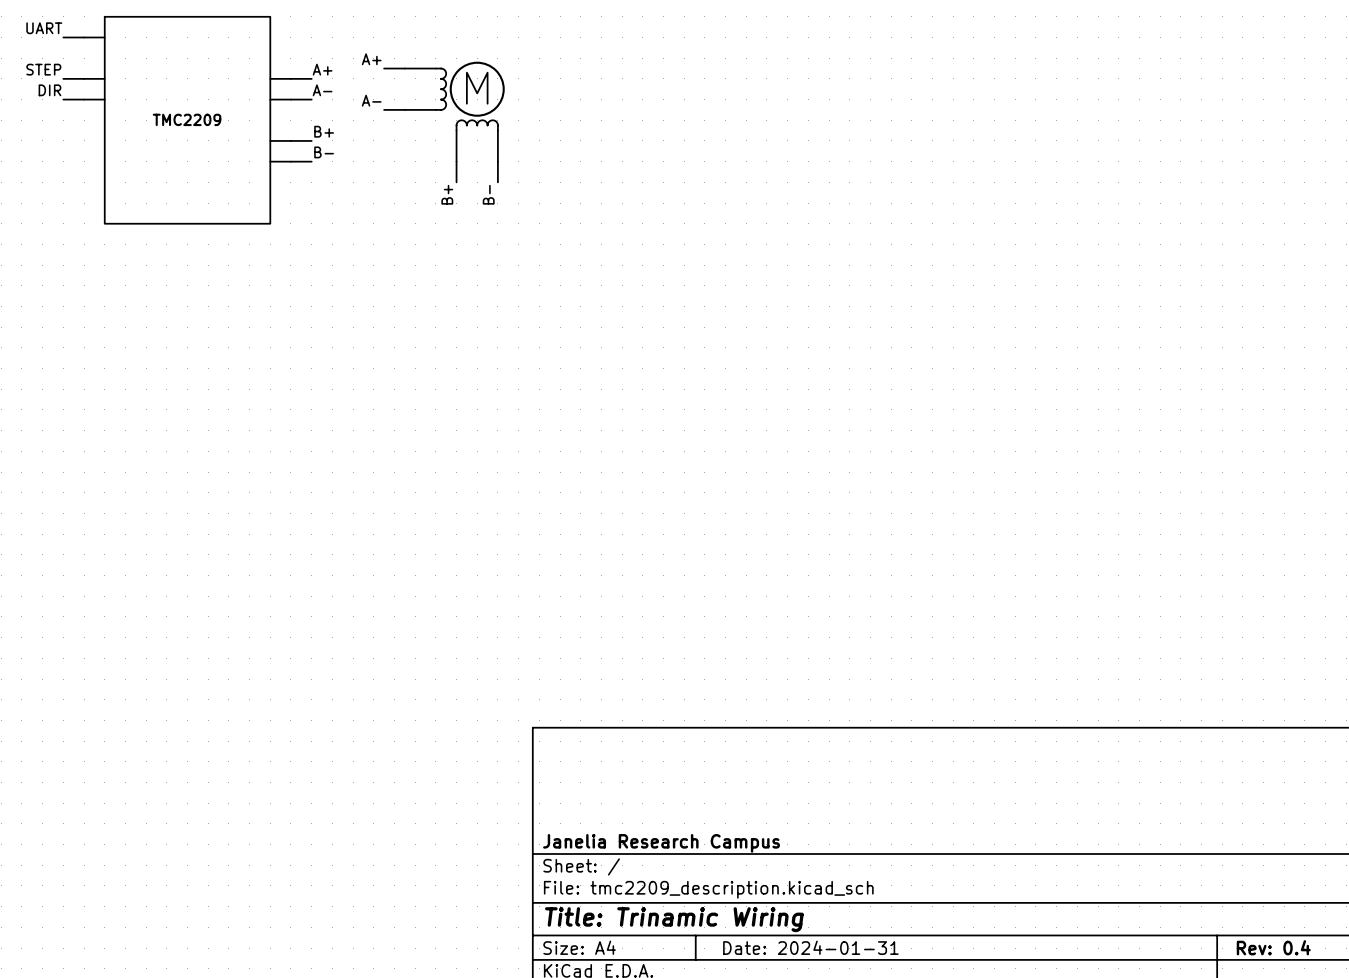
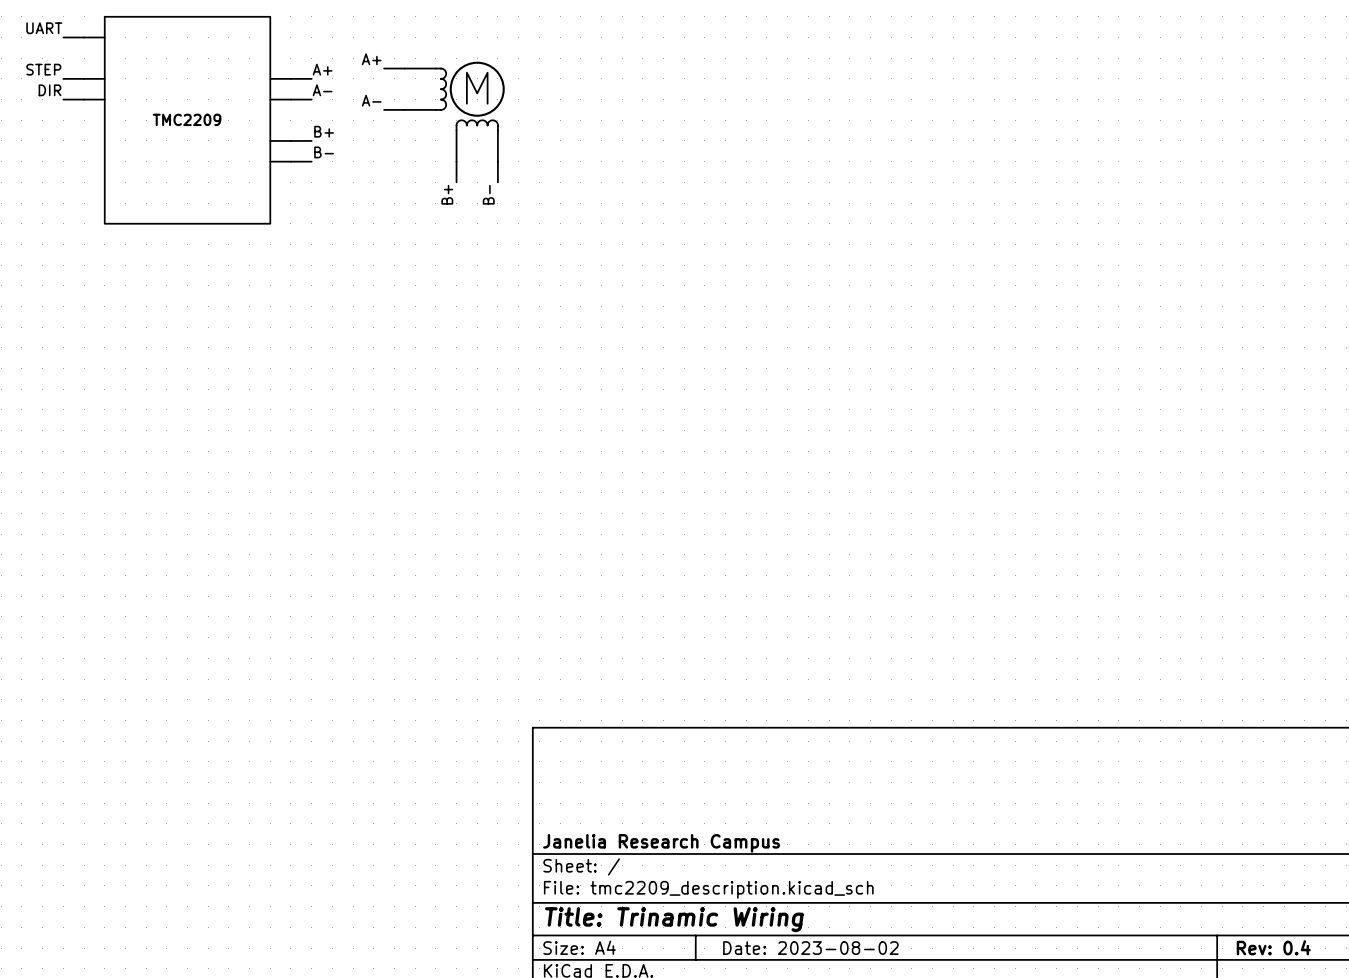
title block: Date: 2024-01-31 (810, 947) -> Date: 2023-08-02 (810, 948)

